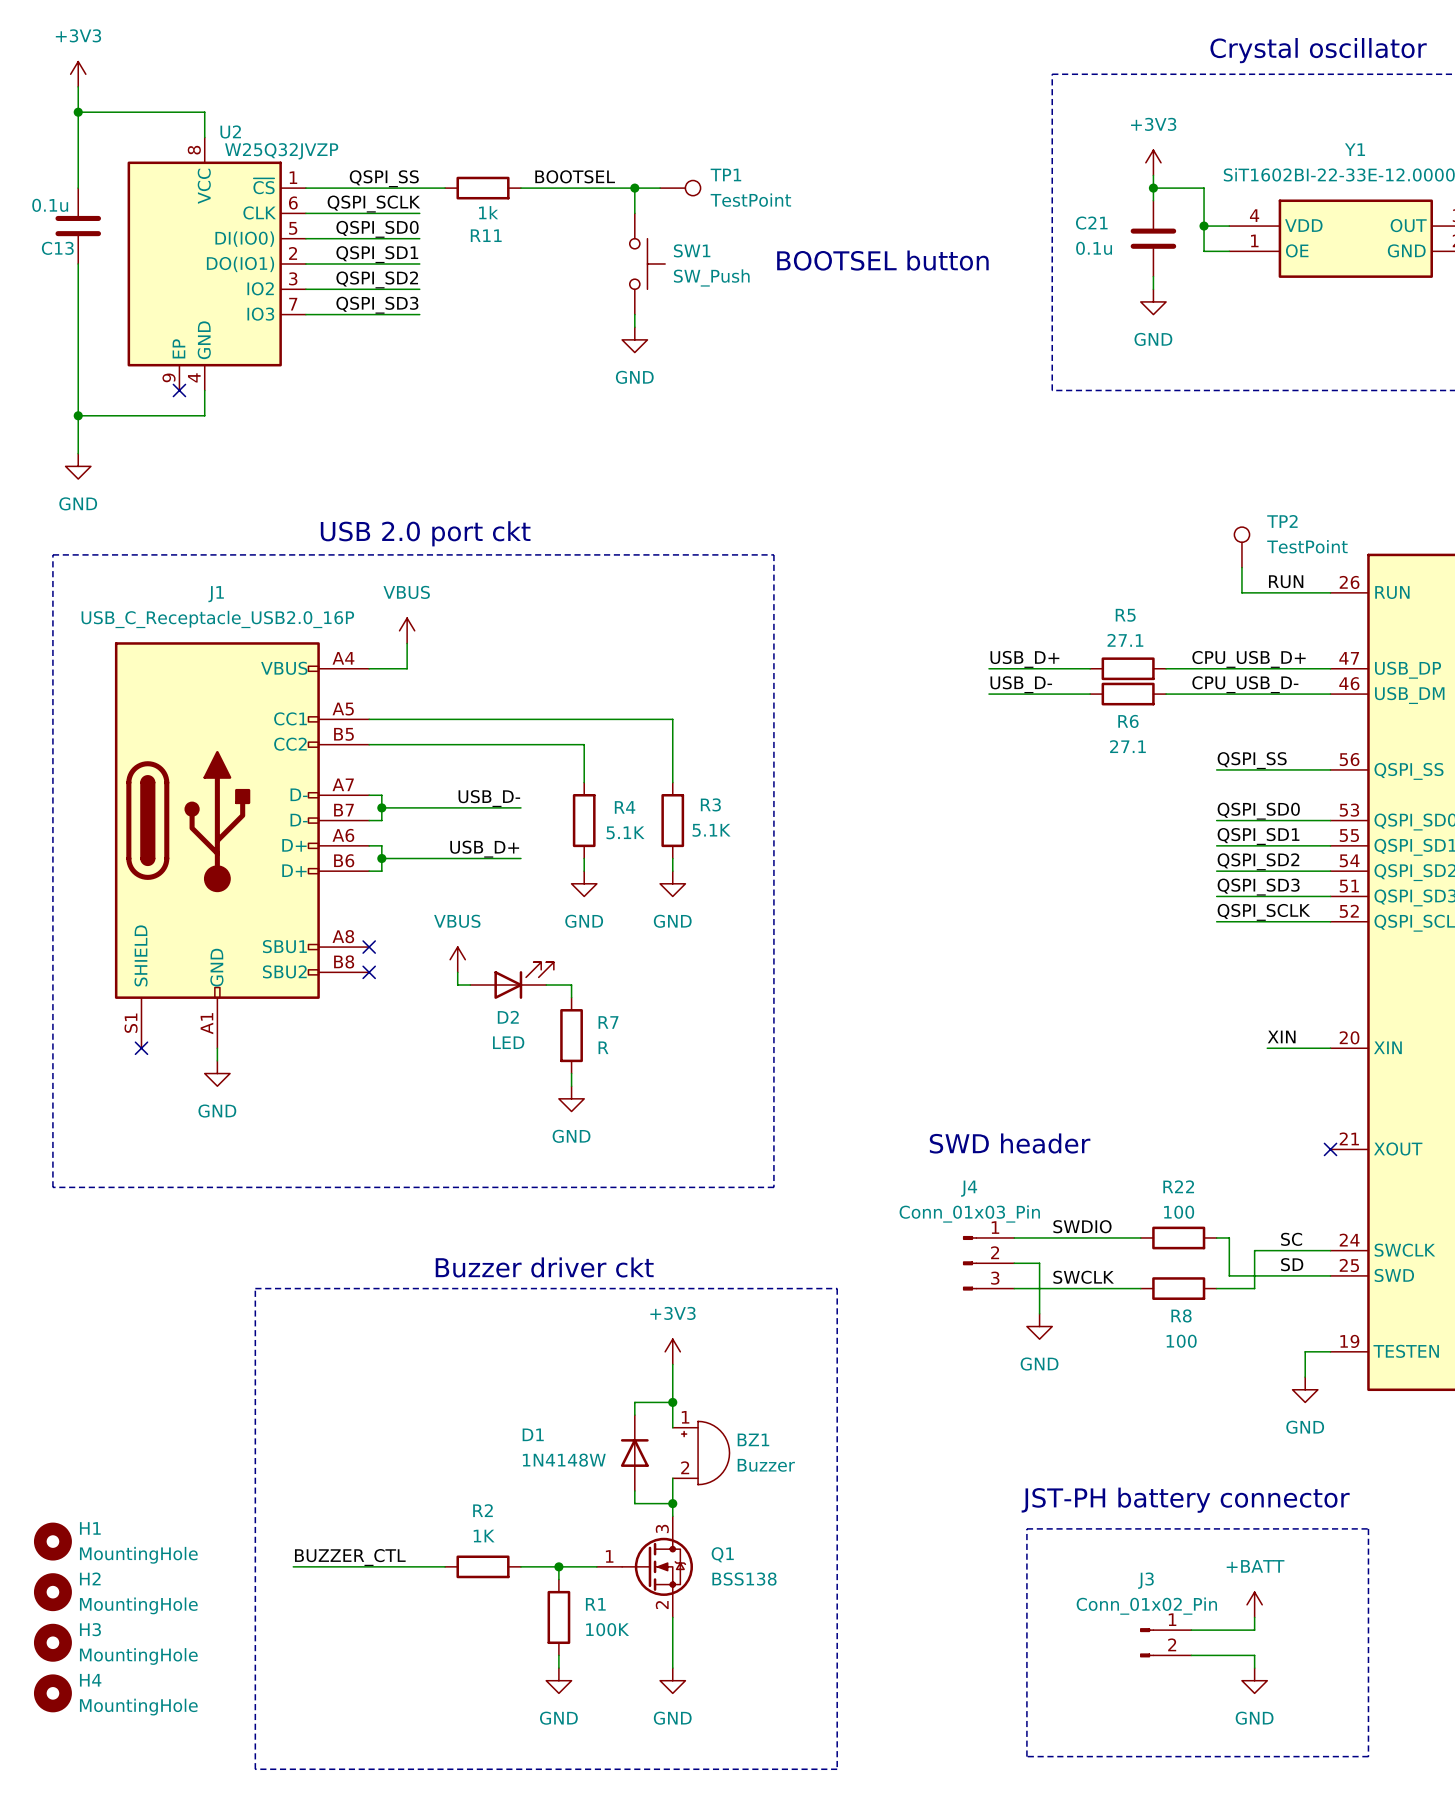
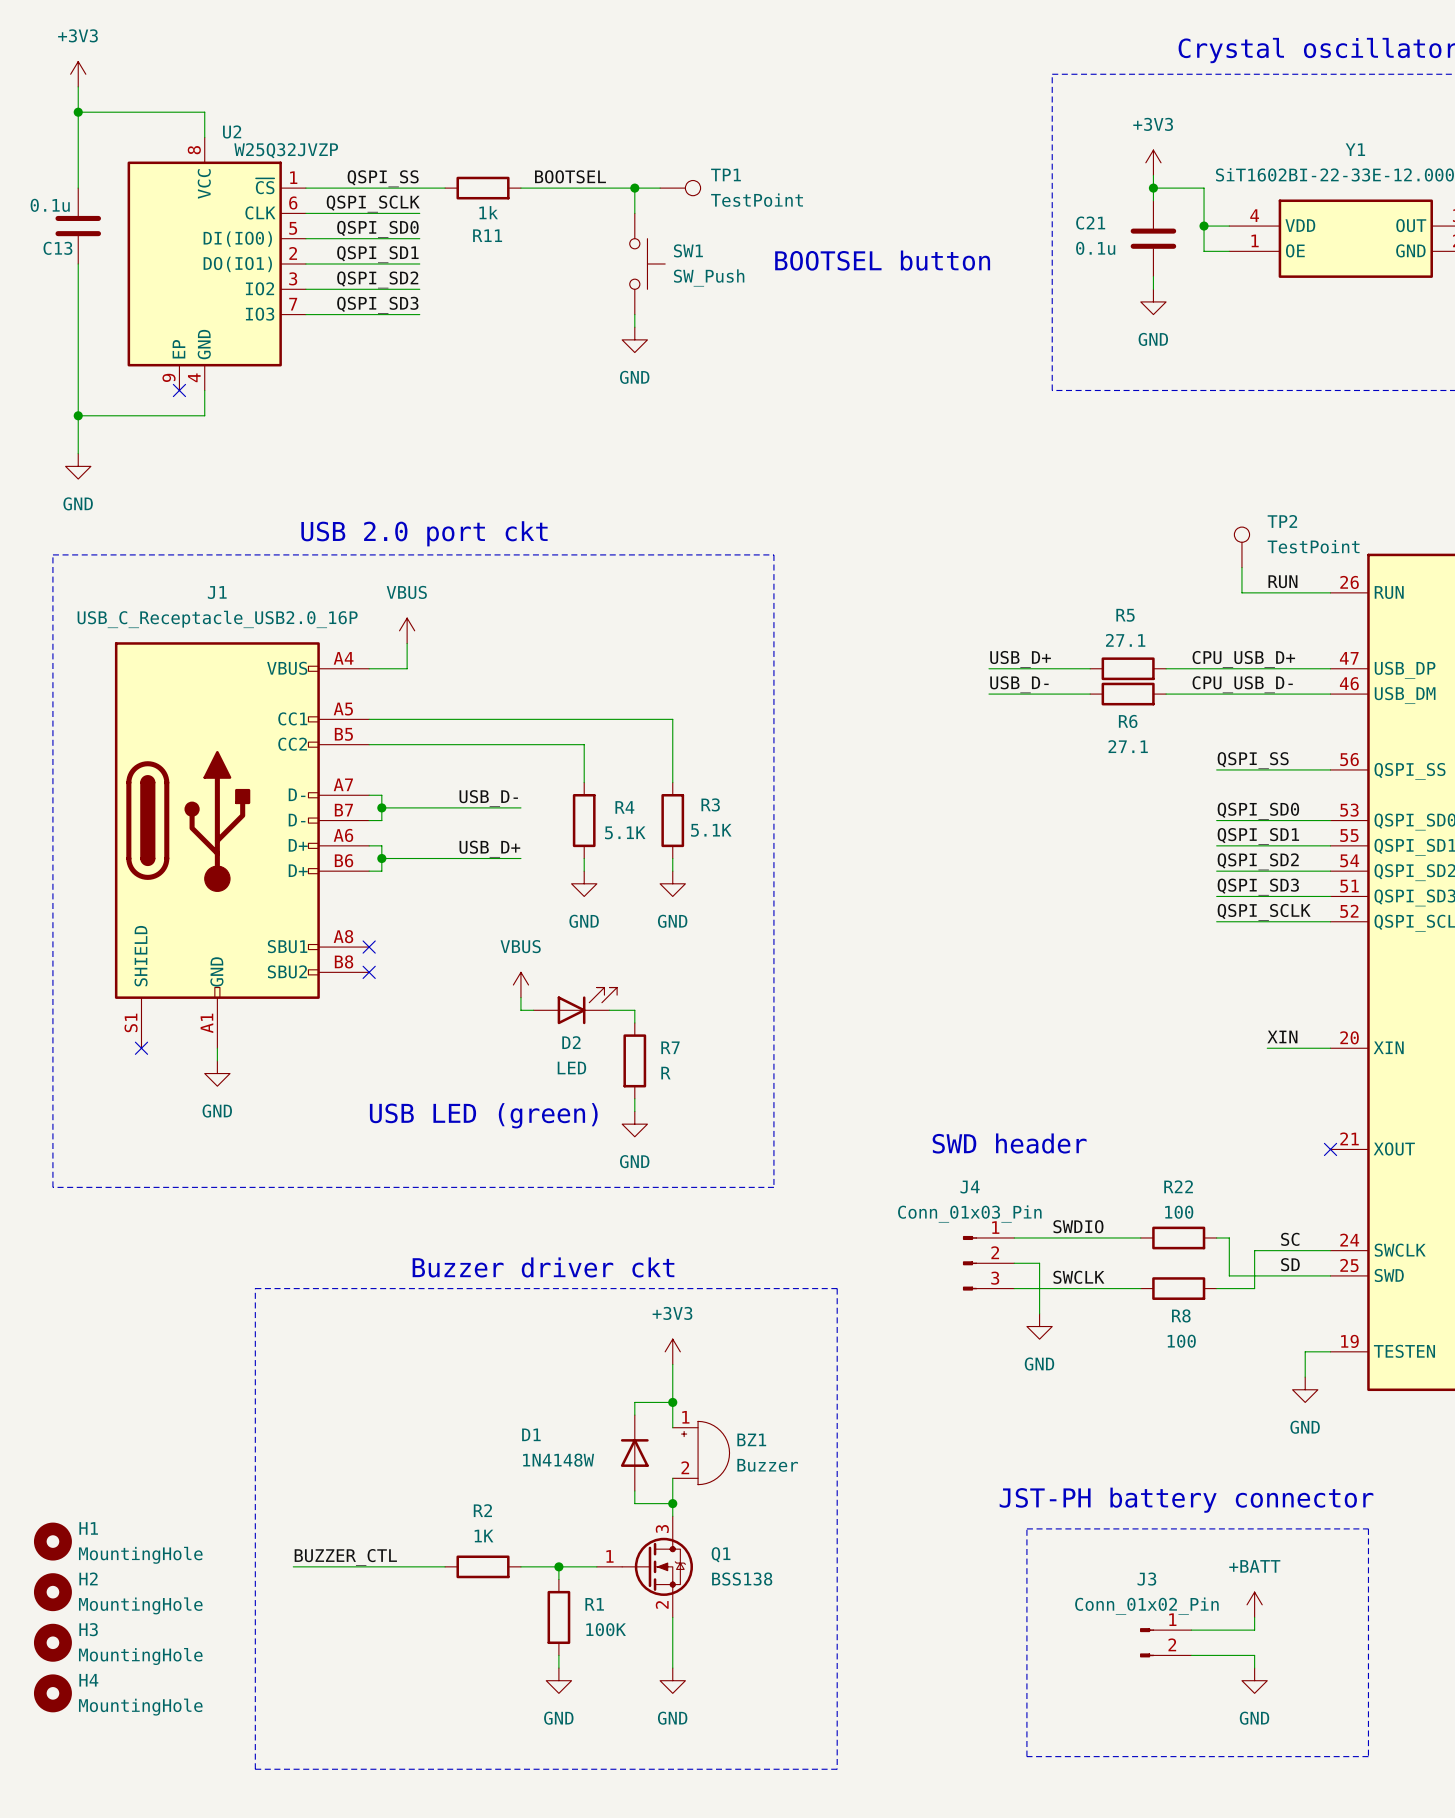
power symbol position: VBUS (457, 959) -> VBUS (520, 985)
wire: (457, 972) (457, 985) (470, 985) -> (520, 997) (520, 1010) (533, 1010)
D2 position: (512, 980) -> (575, 1005)
wire: (546, 985) (571, 985) (571, 997) -> (609, 1010) (634, 1010) (634, 1022)
R7 position: (571, 1035) -> (634, 1060)
wire: (571, 1073) (571, 1086) -> (634, 1098) (634, 1111)
power symbol position: GND (571, 1098) -> GND (634, 1124)
text: none -> USB LED (green) (483, 1115)

